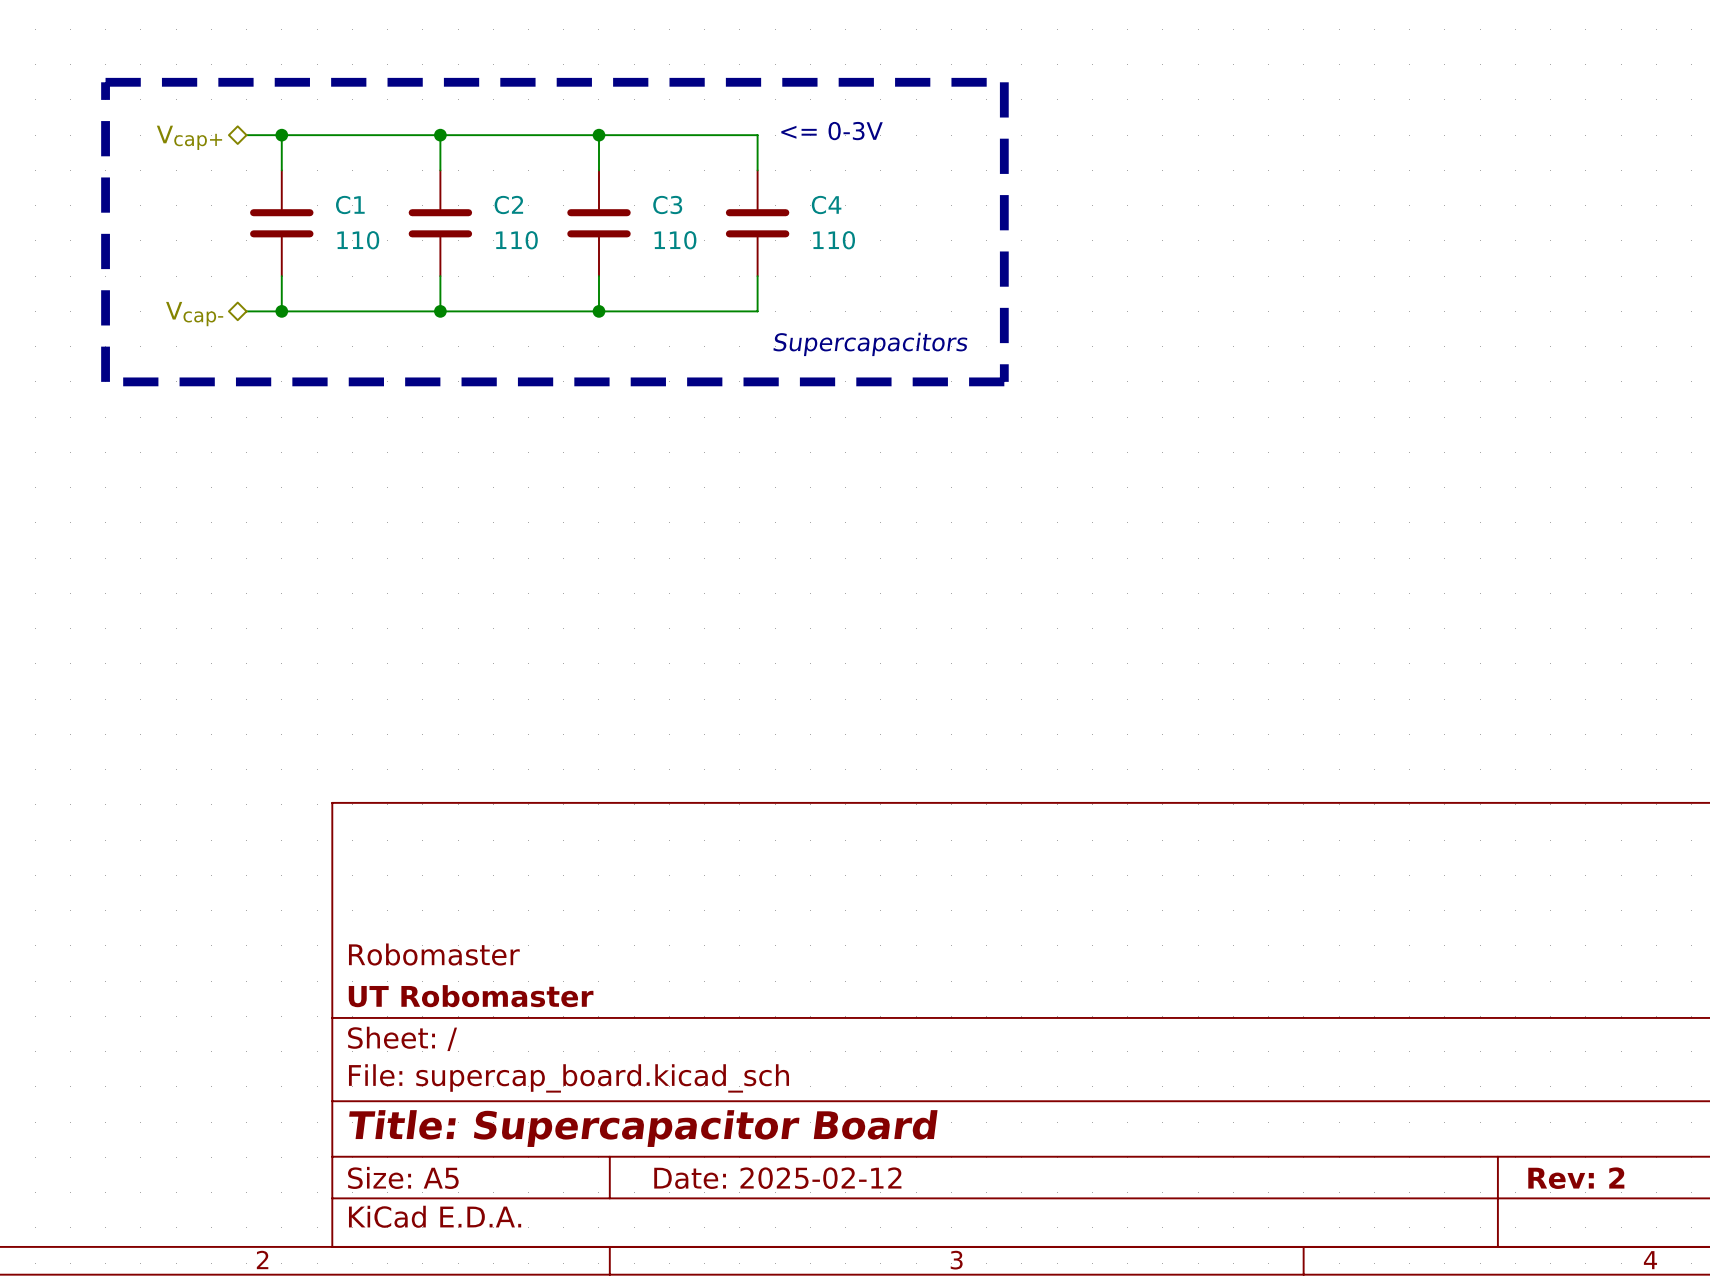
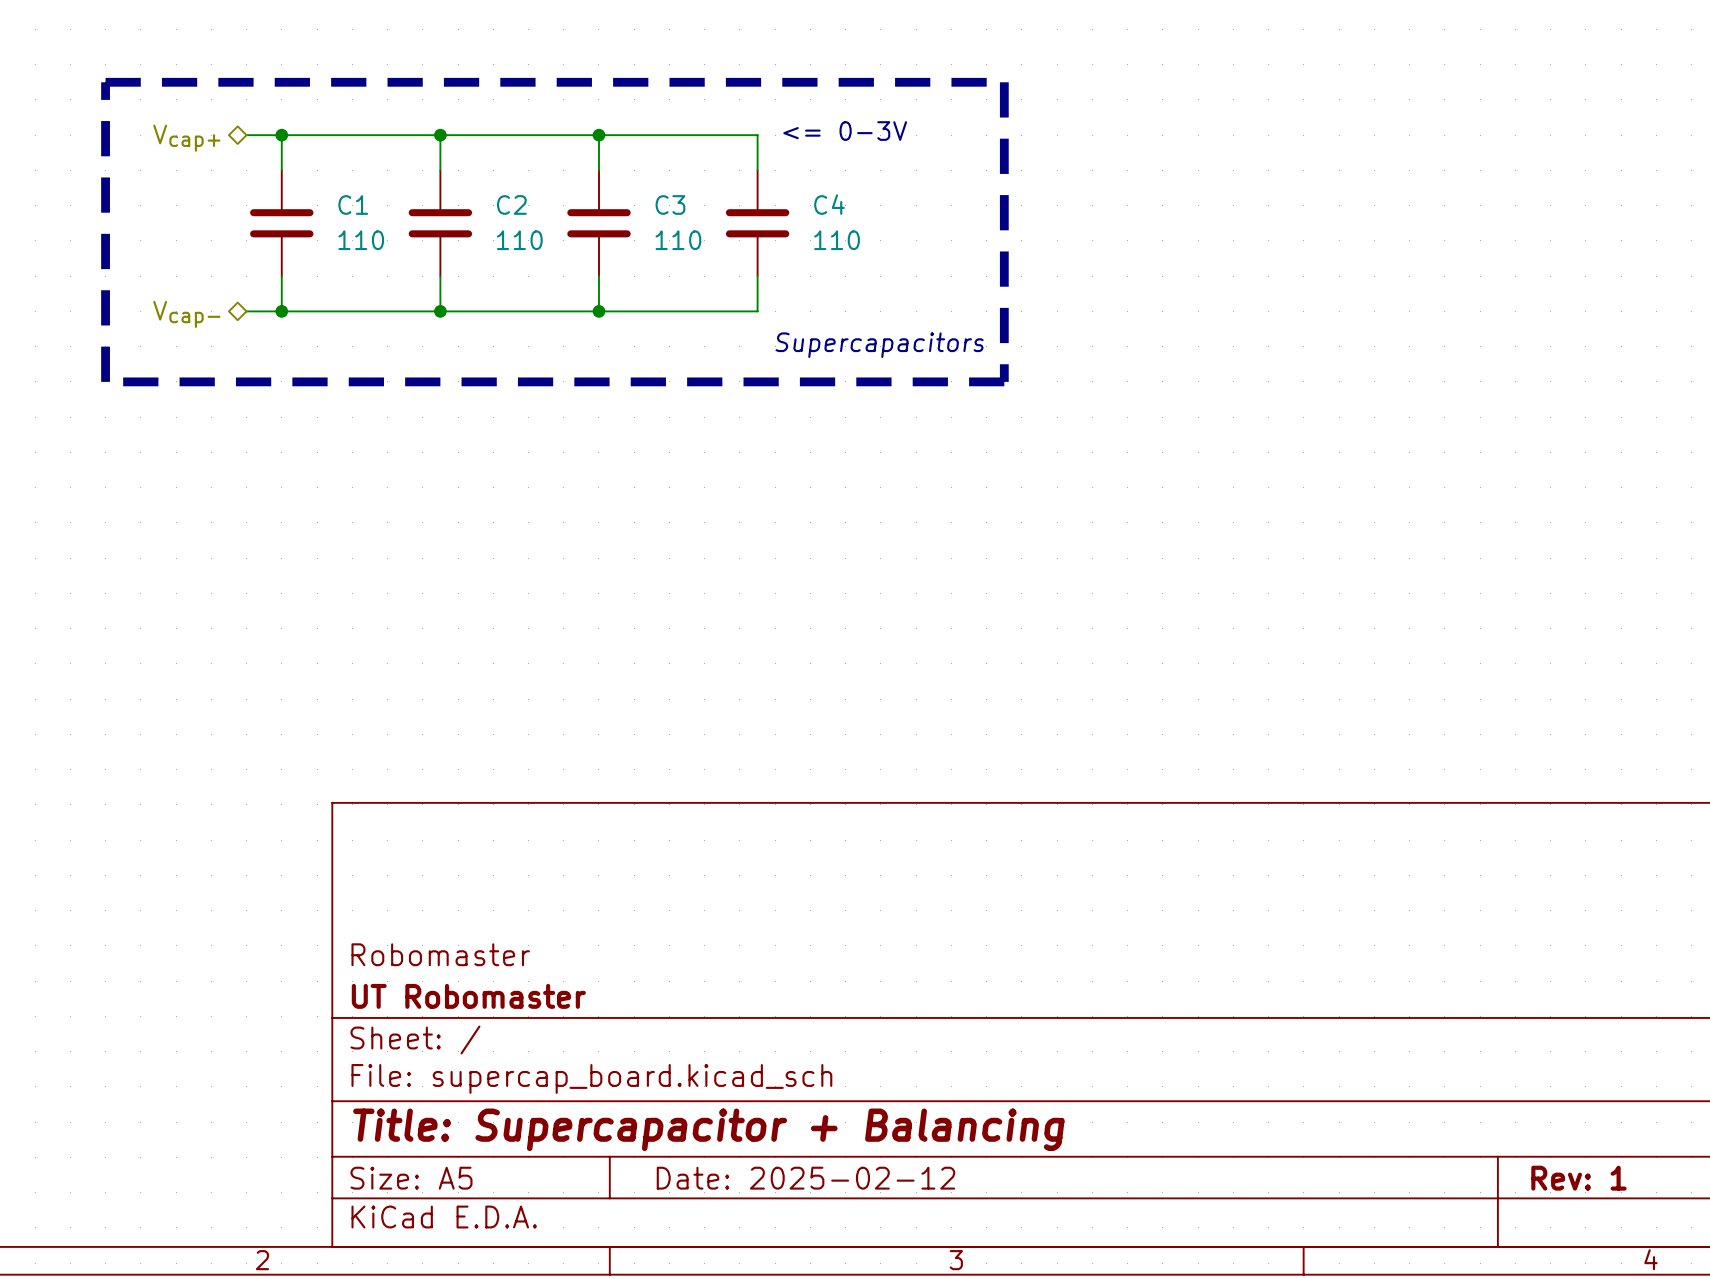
title block: Title: Supercapacitor Board (643, 1128) -> Title: Supercapacitor + Balancing (708, 1129)
title block: Rev: 2 (1576, 1178) -> Rev: 1 (1578, 1178)

